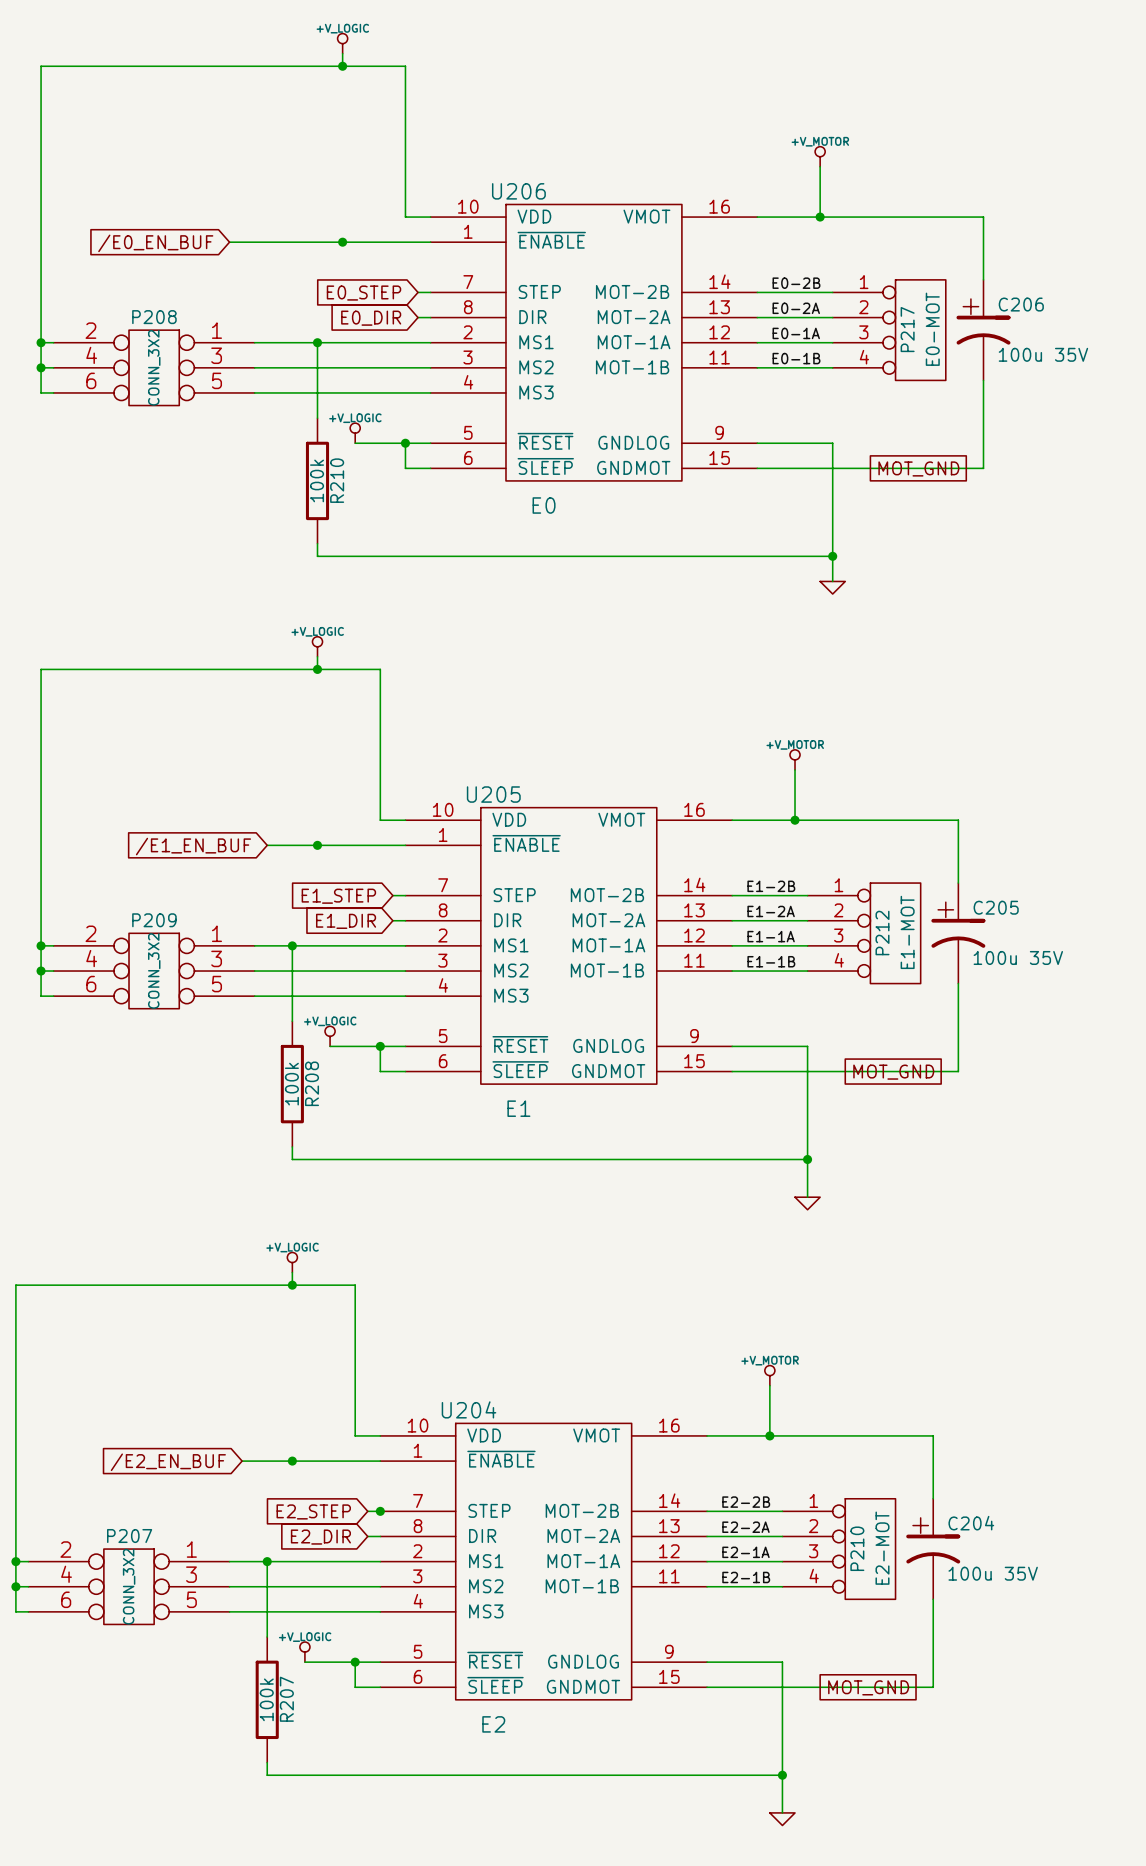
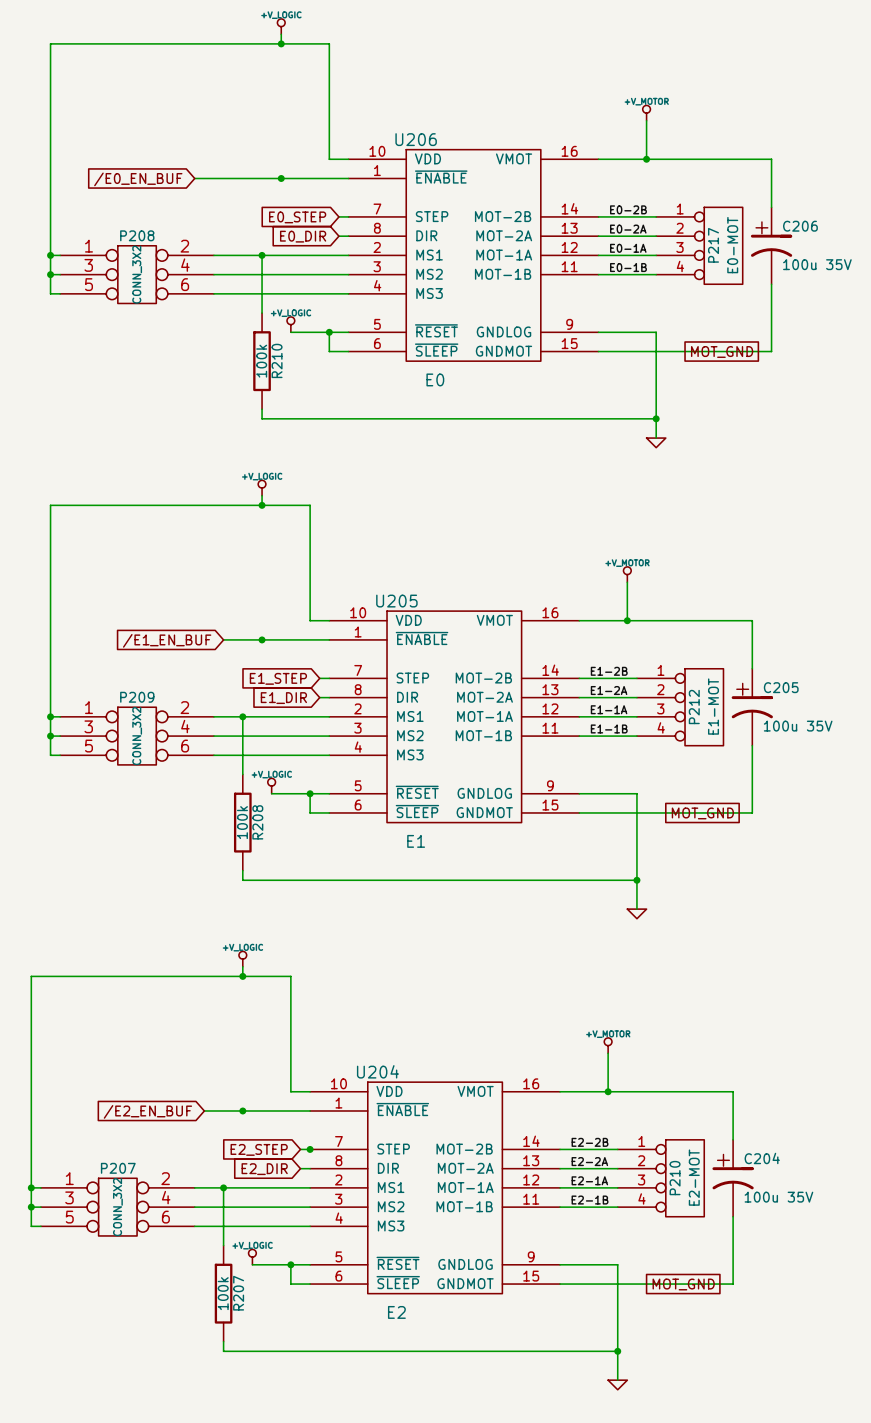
P208 flip: as is (154, 367) -> left-right (137, 274)
P209 flip: as is (154, 971) -> left-right (137, 736)
P207 flip: as is (129, 1586) -> left-right (117, 1207)

